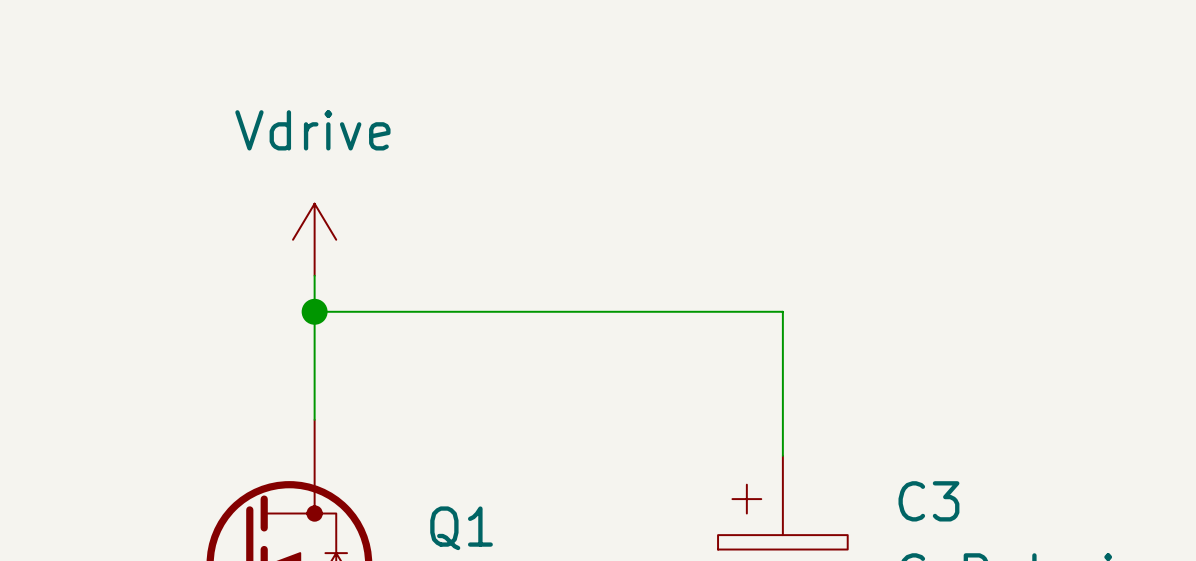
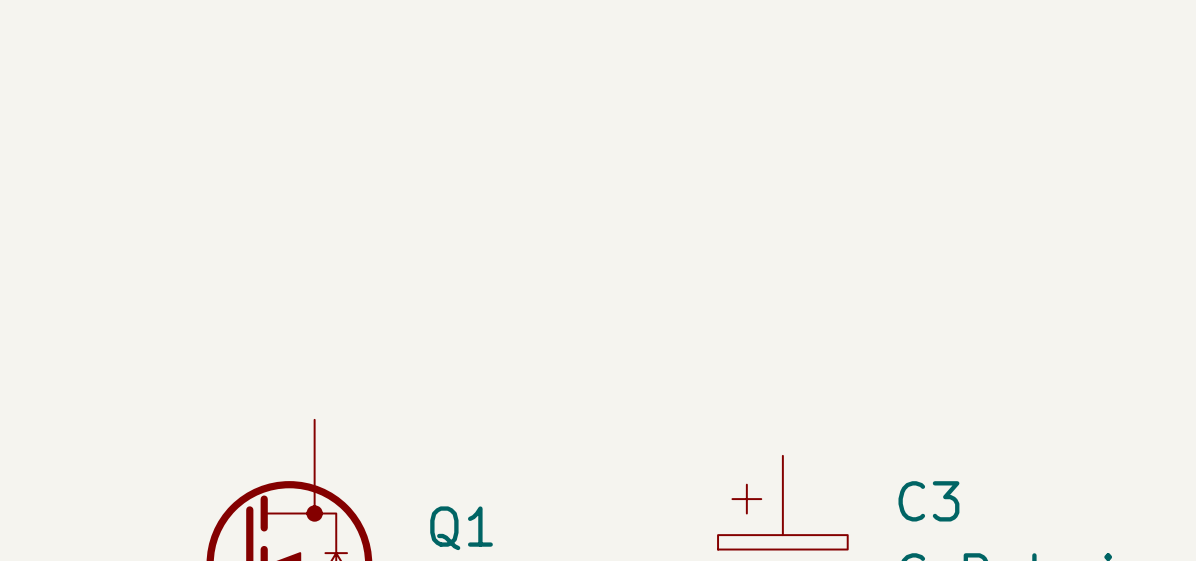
power symbol: Vdrive (314, 239) -> none
wire: (314, 275) (314, 419) -> none
wire: (314, 311) (782, 311) (782, 455) -> none
junction: (314, 311) -> none

